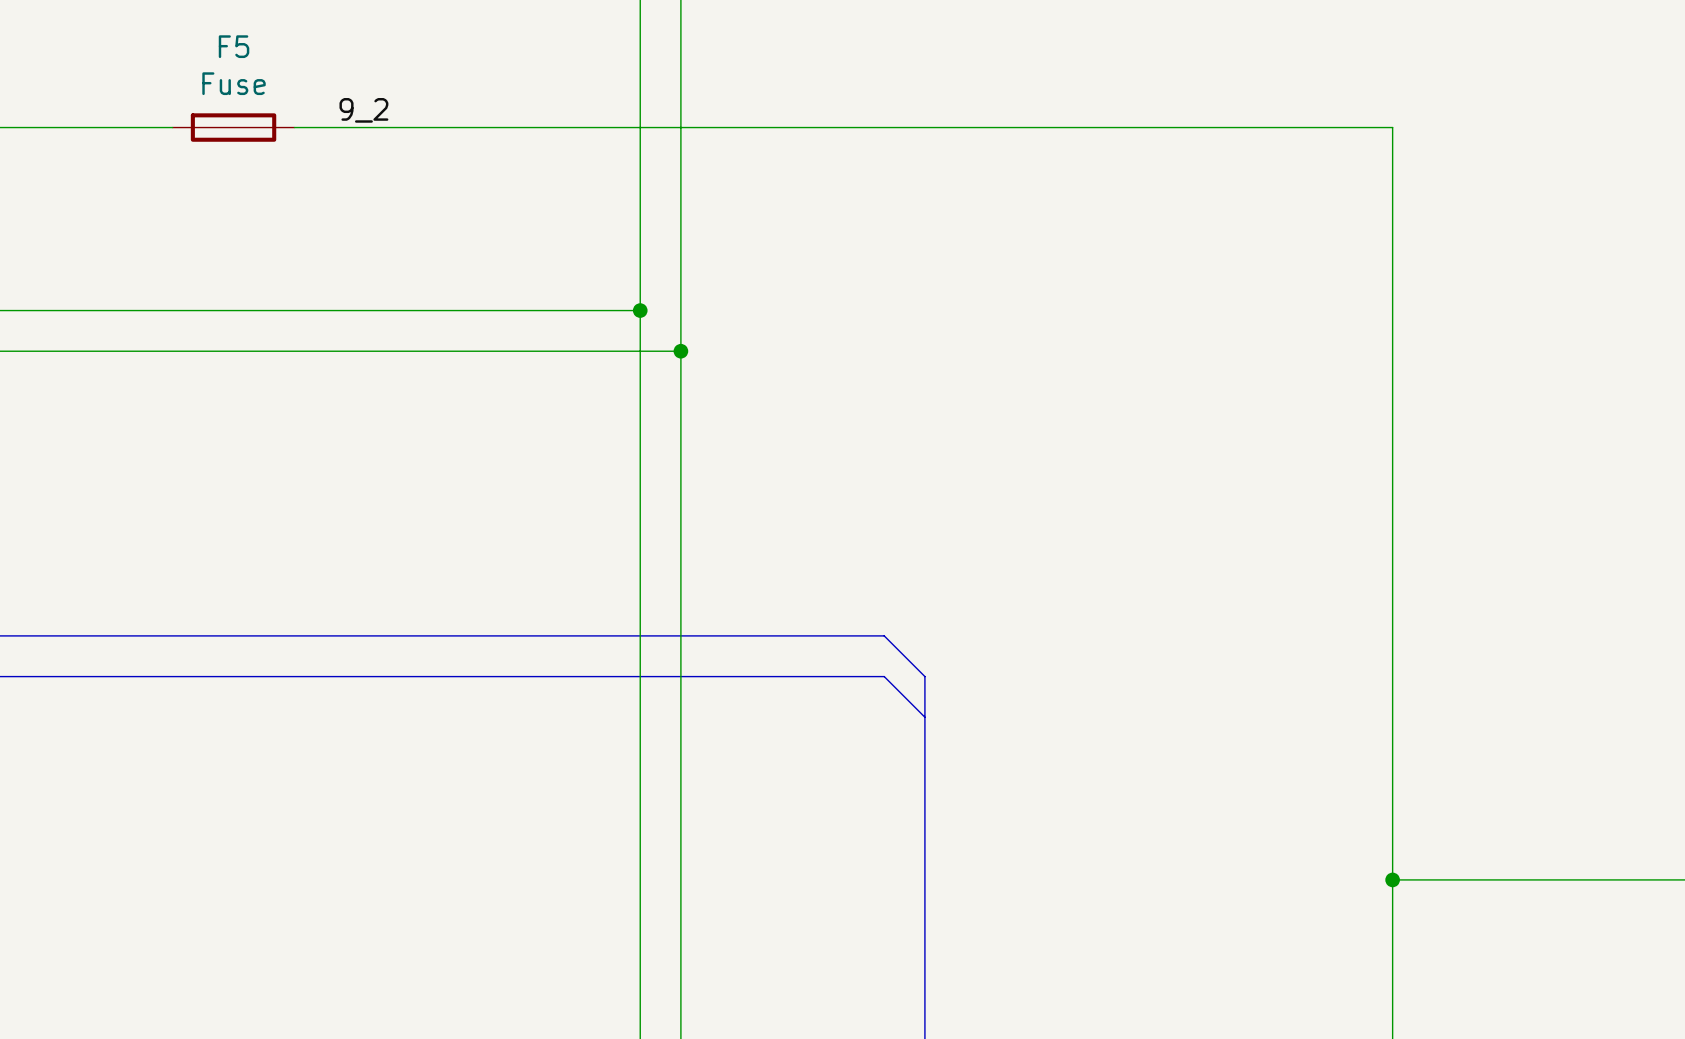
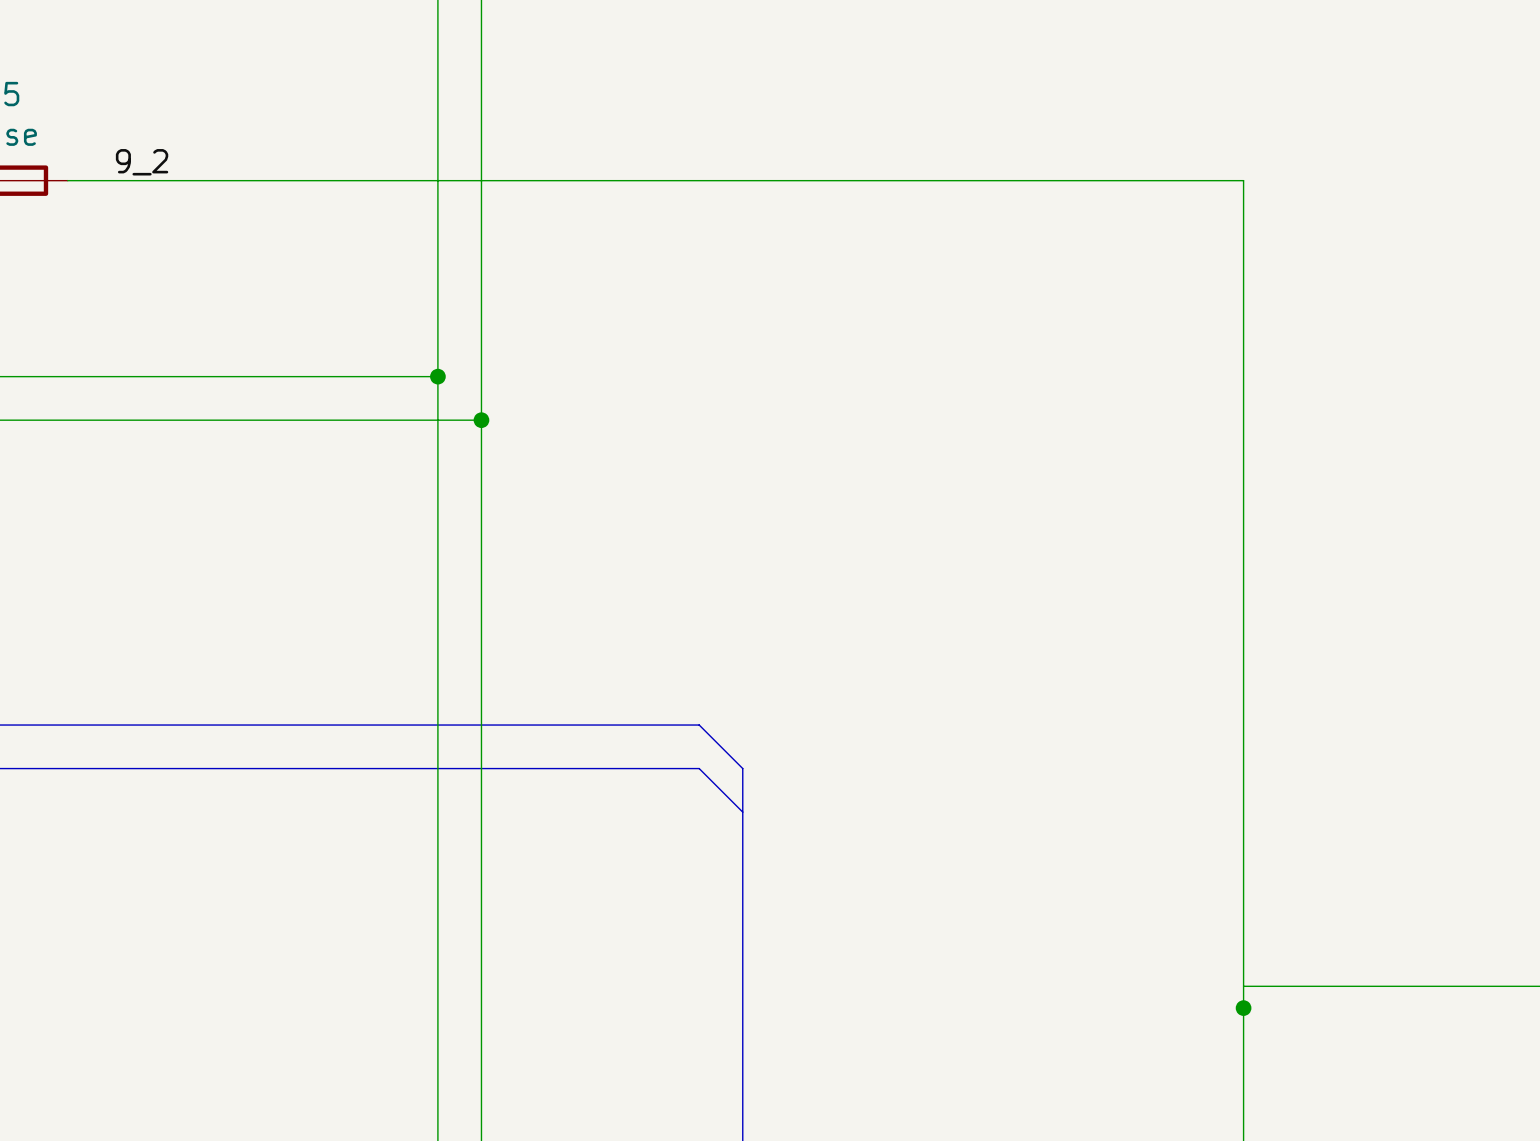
junction position: (1392, 879) -> (1243, 1008)

